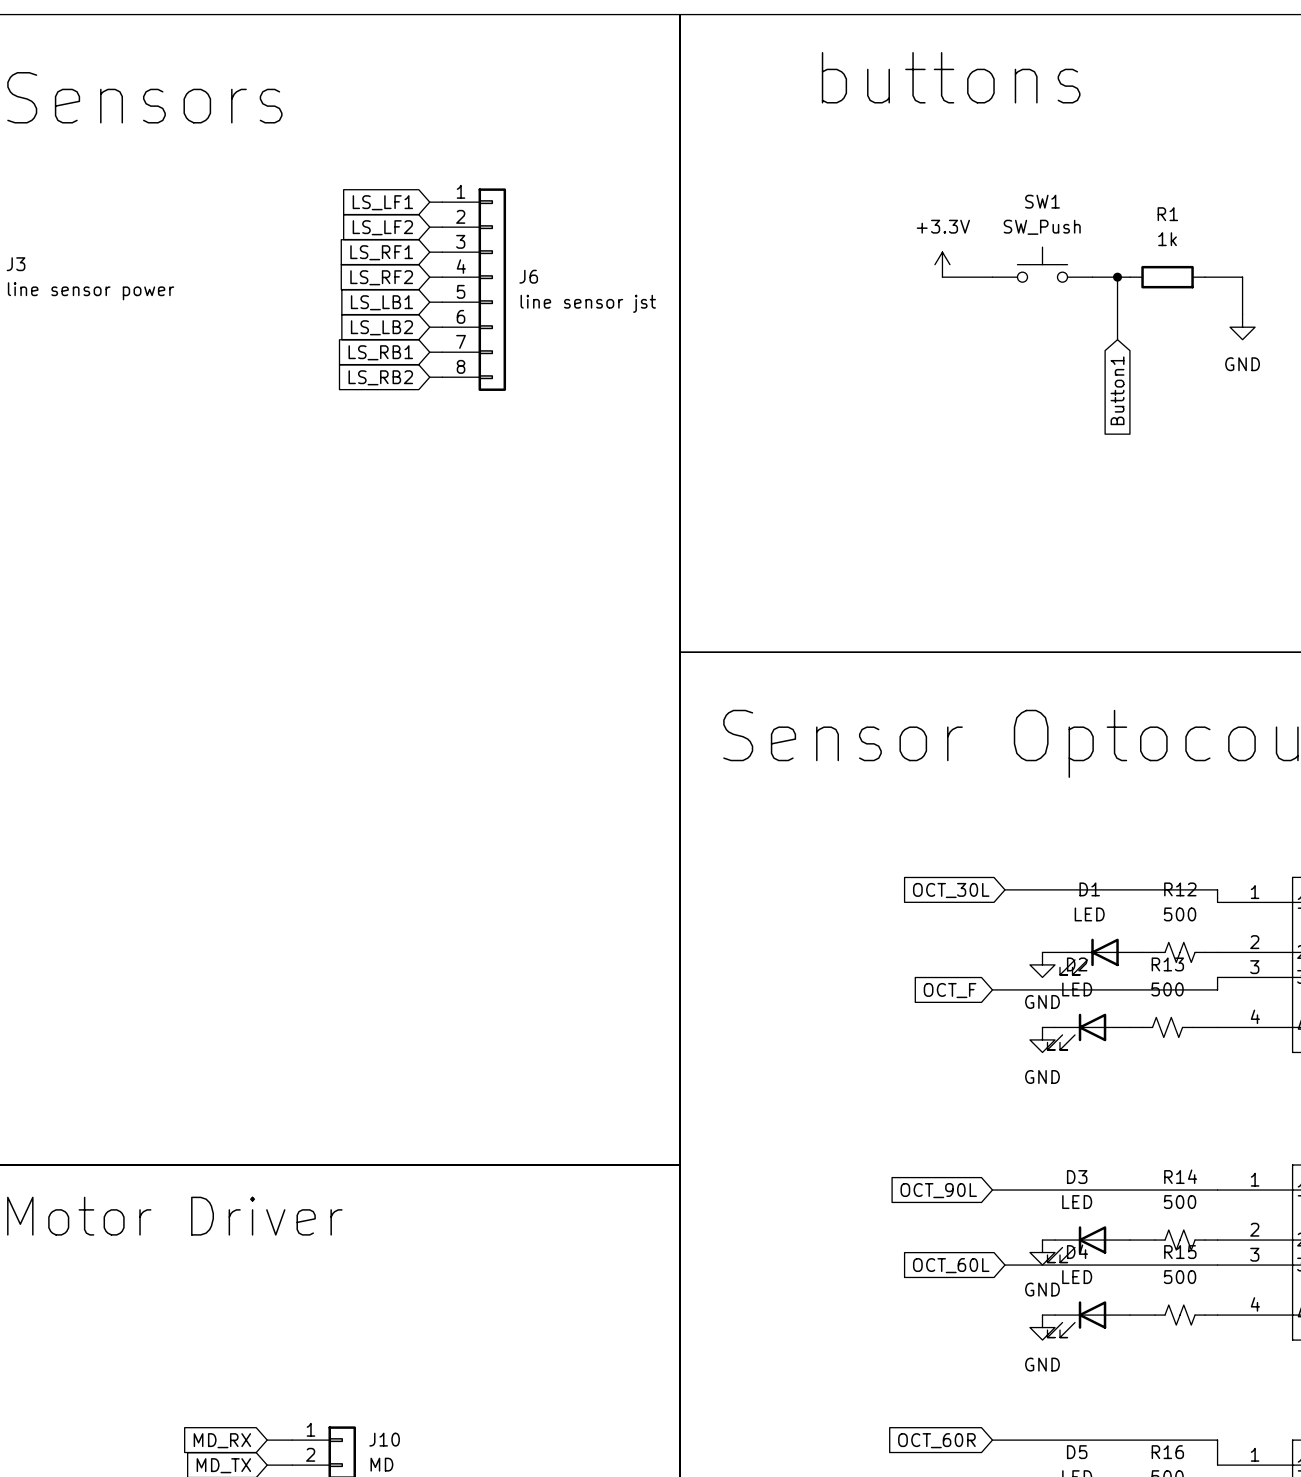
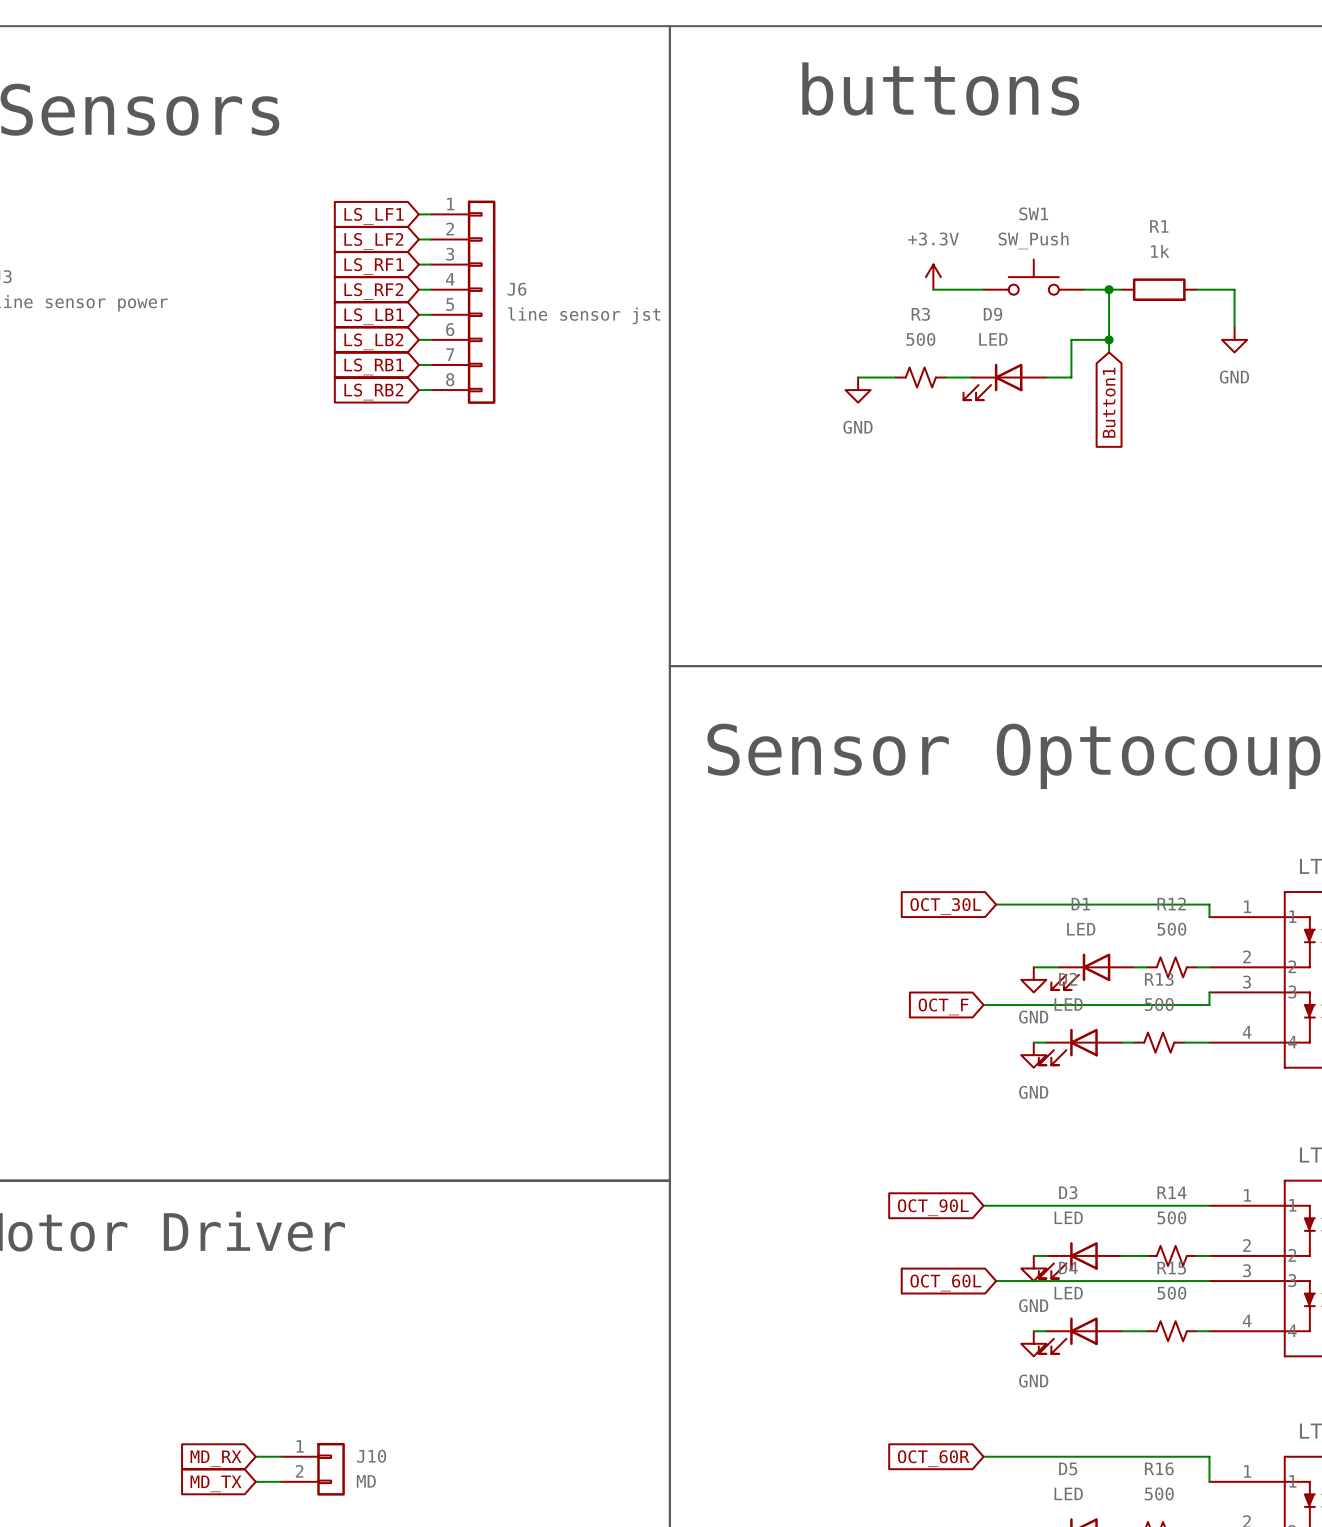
wire: none -> (1109, 339) (1071, 339) (1071, 377) (1046, 377)
junction: none -> (1109, 339)
wire: none -> (858, 377) (895, 377)
R3: none -> 500 (920, 377)
wire: none -> (945, 377) (971, 377)
D9: none -> LED (1004, 381)
power symbol: none -> GND (858, 390)

